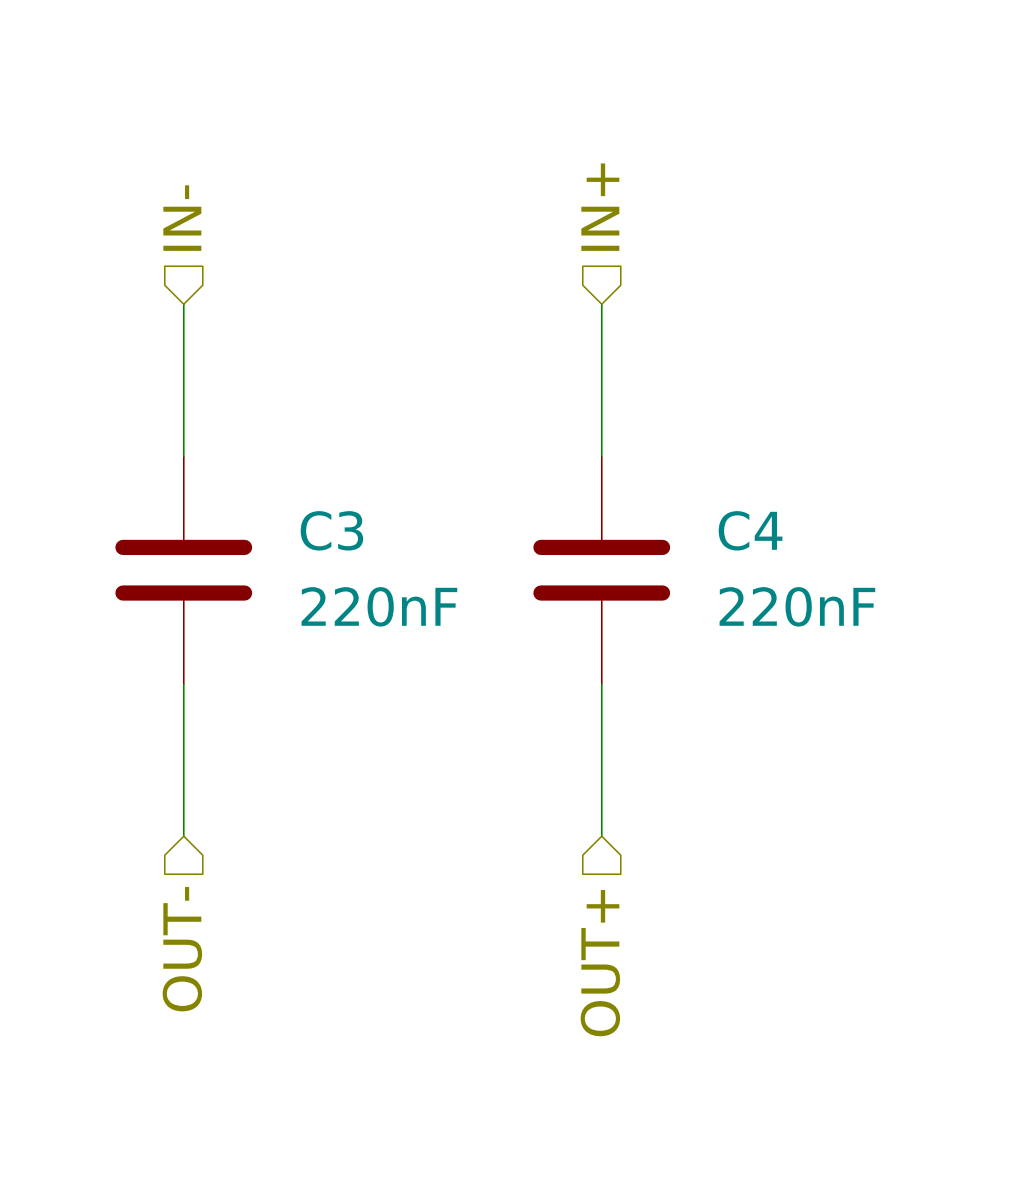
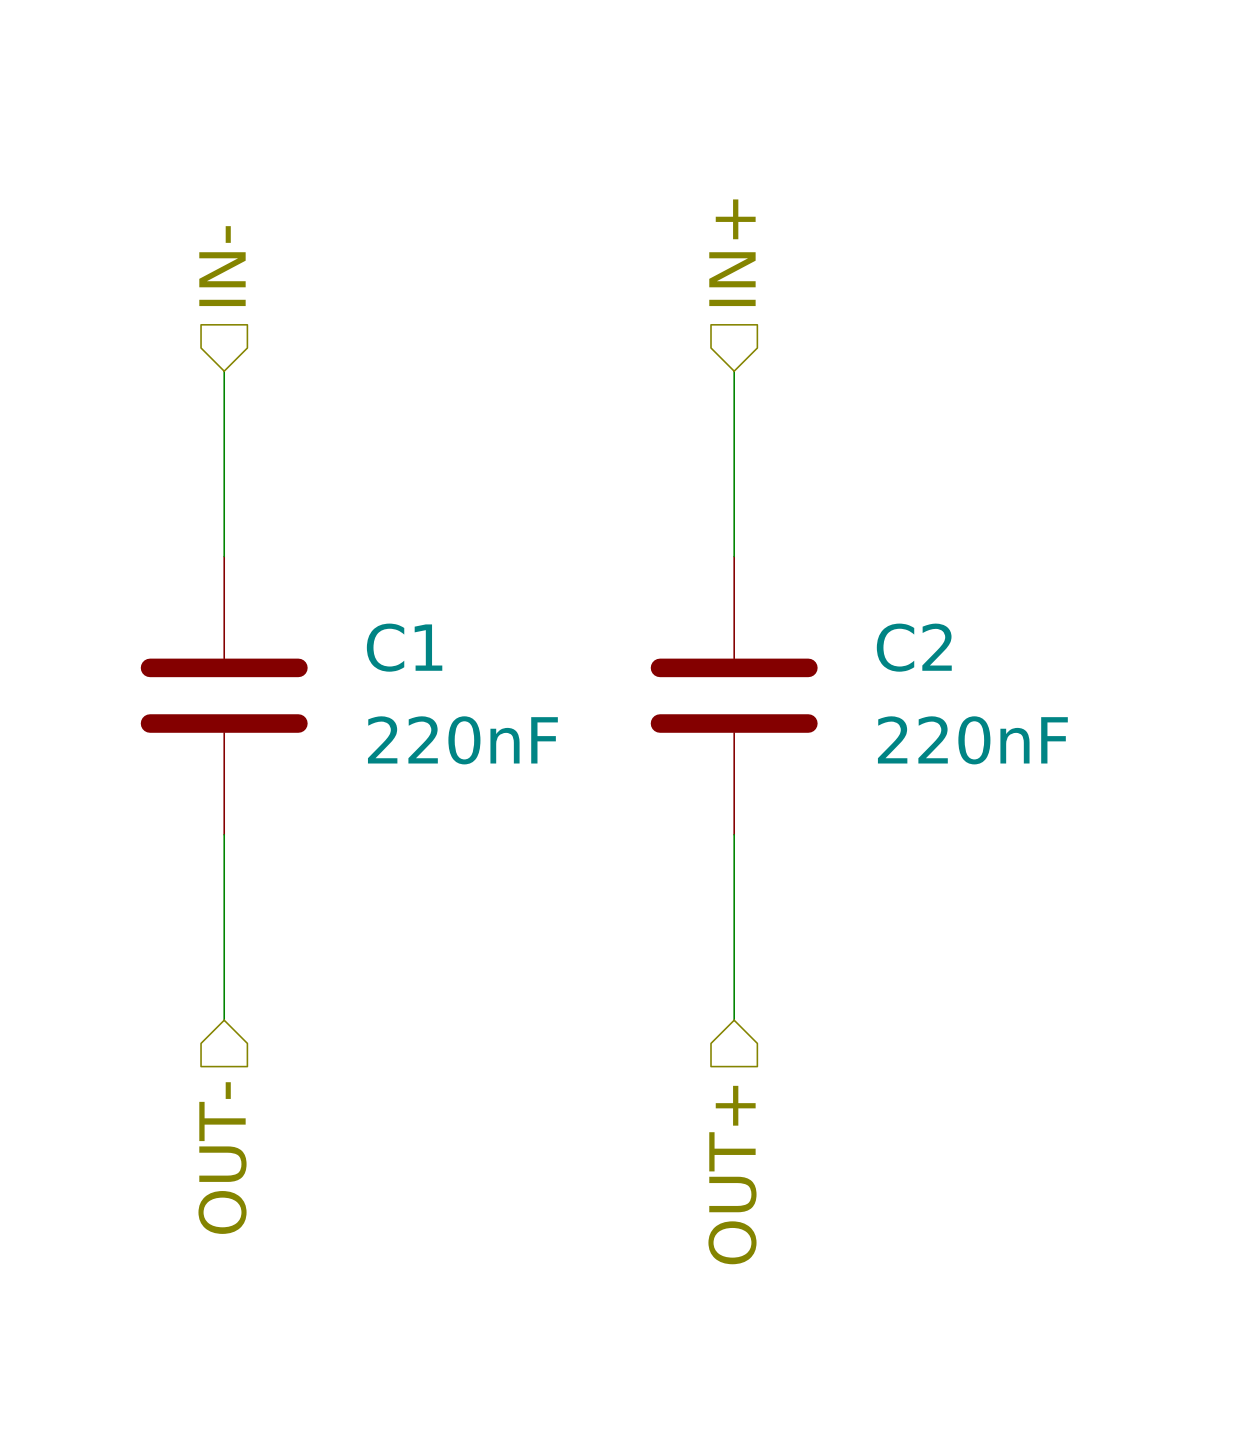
C3 name: C3 (331, 530) -> C1 (404, 647)
C4 name: C4 (750, 530) -> C2 (914, 647)

